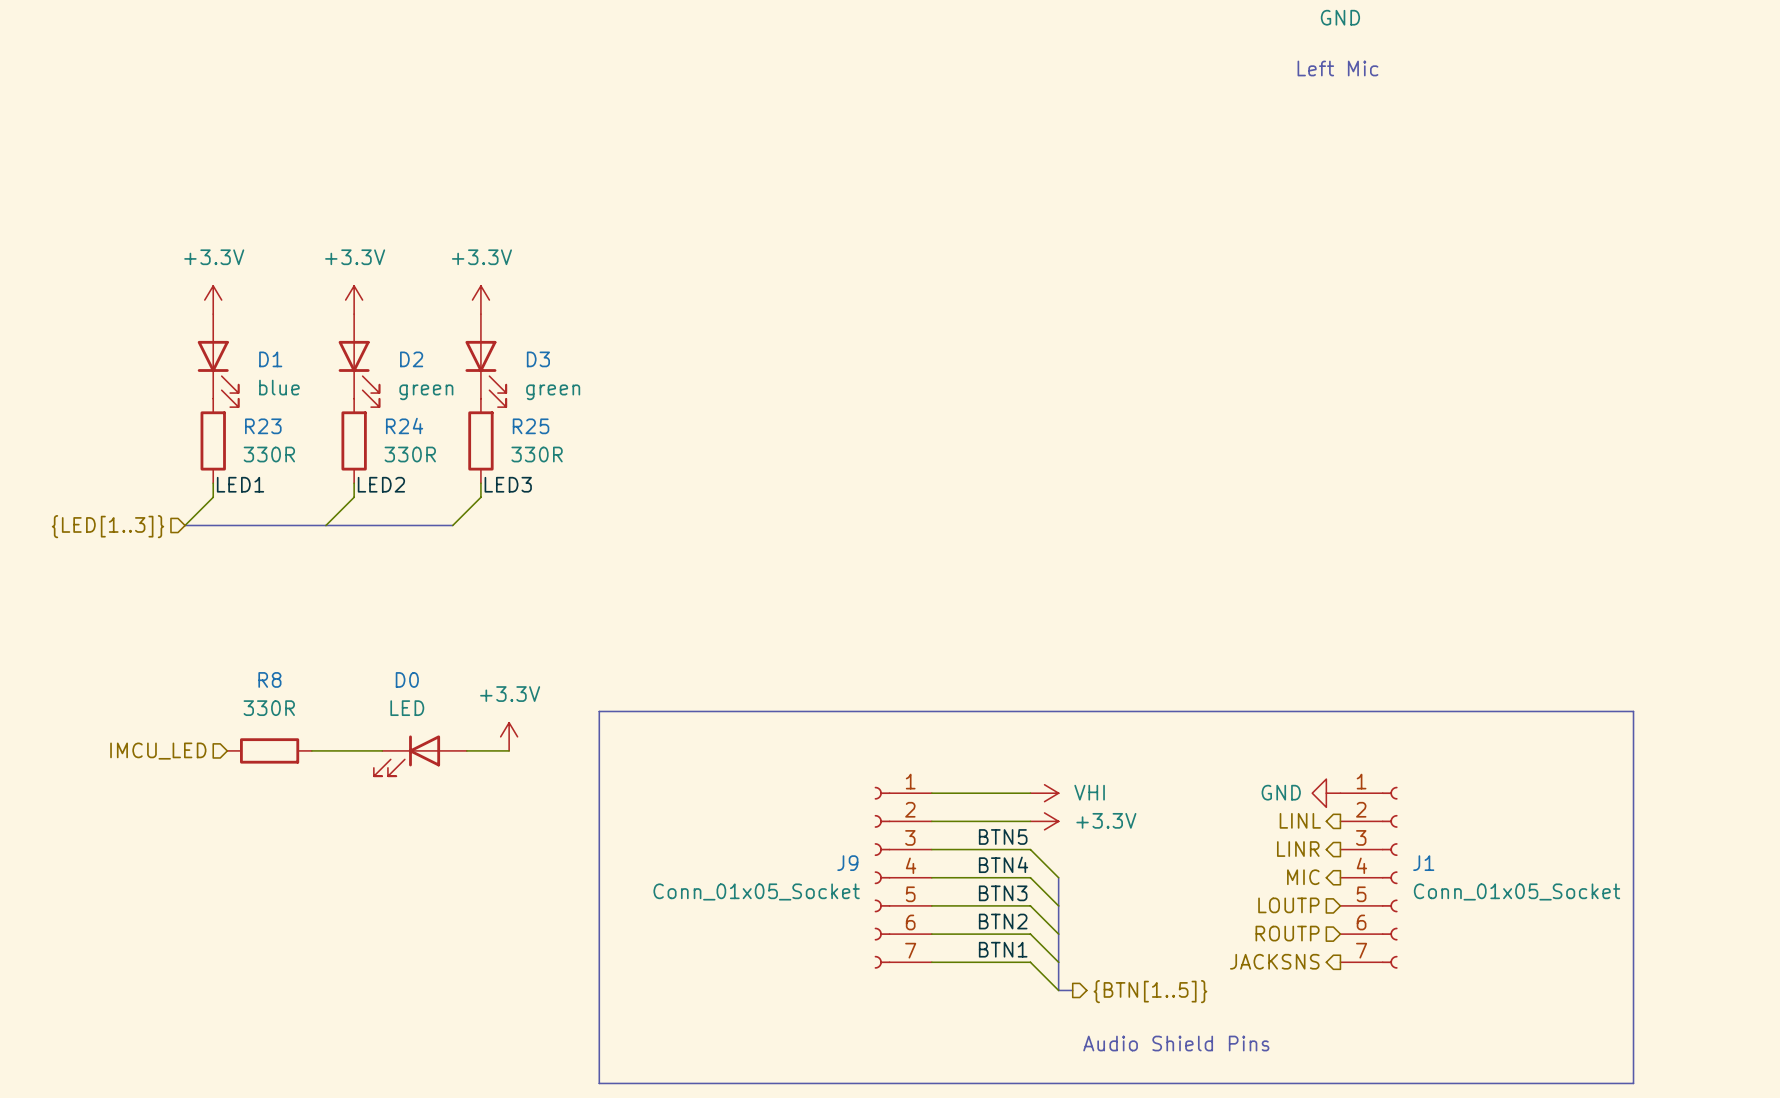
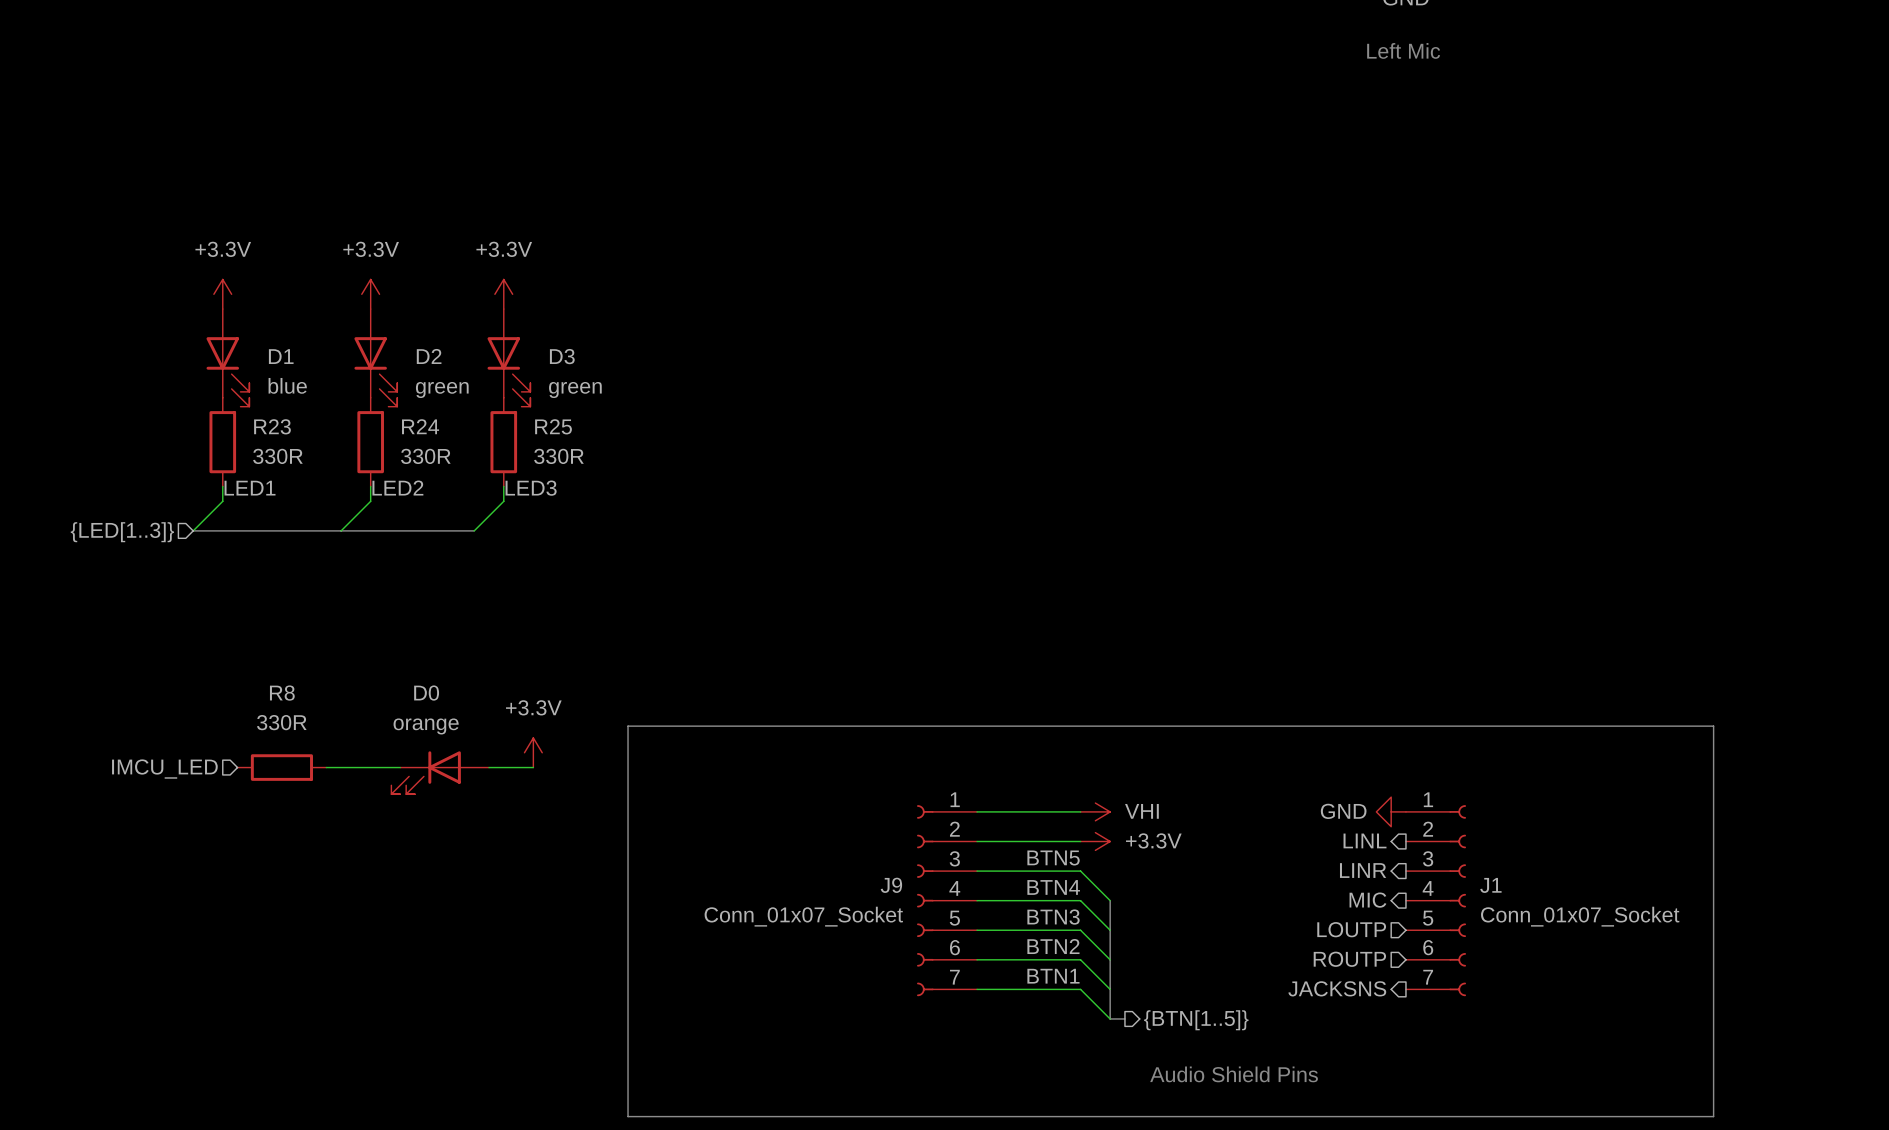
D0 value: LED (407, 708) -> orange (426, 726)
J9 value: Conn_01x05_Socket (756, 891) -> Conn_01x07_Socket (803, 916)
J1 value: Conn_01x05_Socket (1517, 891) -> Conn_01x07_Socket (1580, 916)

